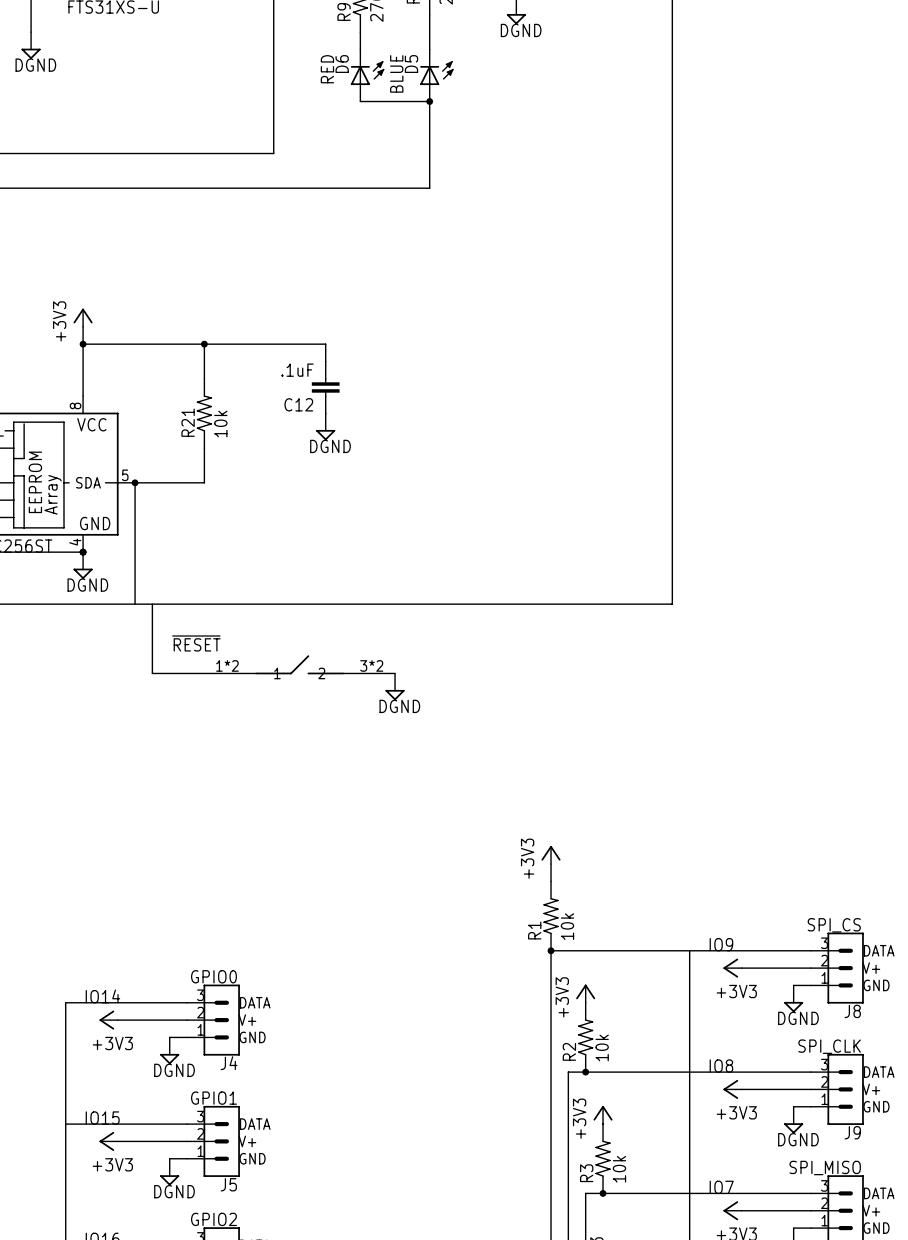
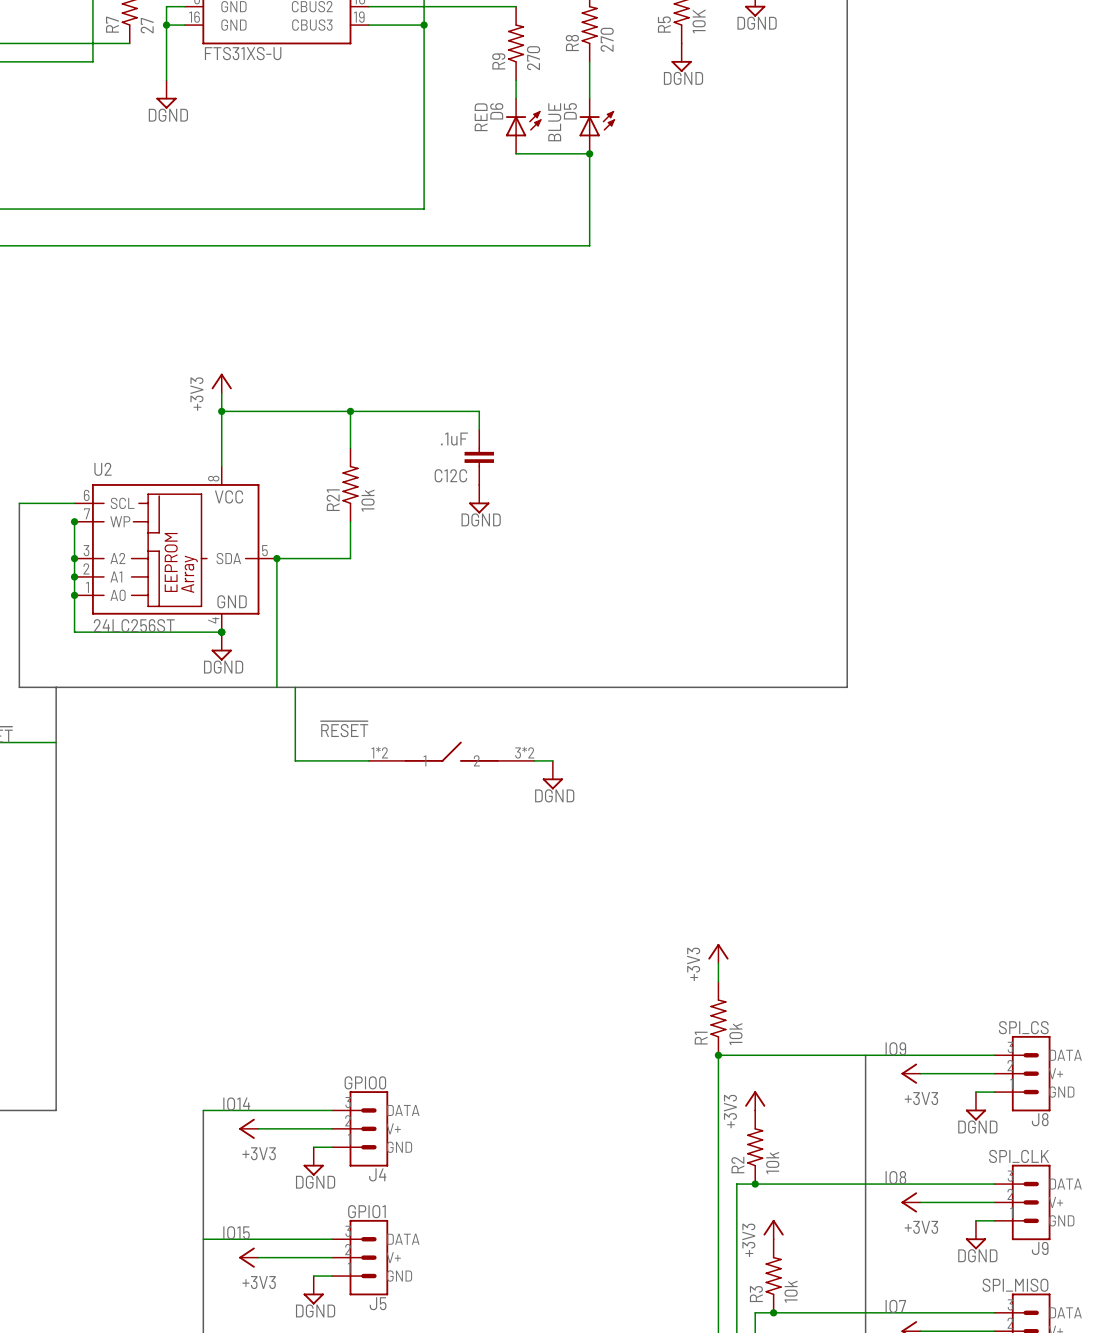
C12 name: C12 (298, 404) -> C12C (450, 475)

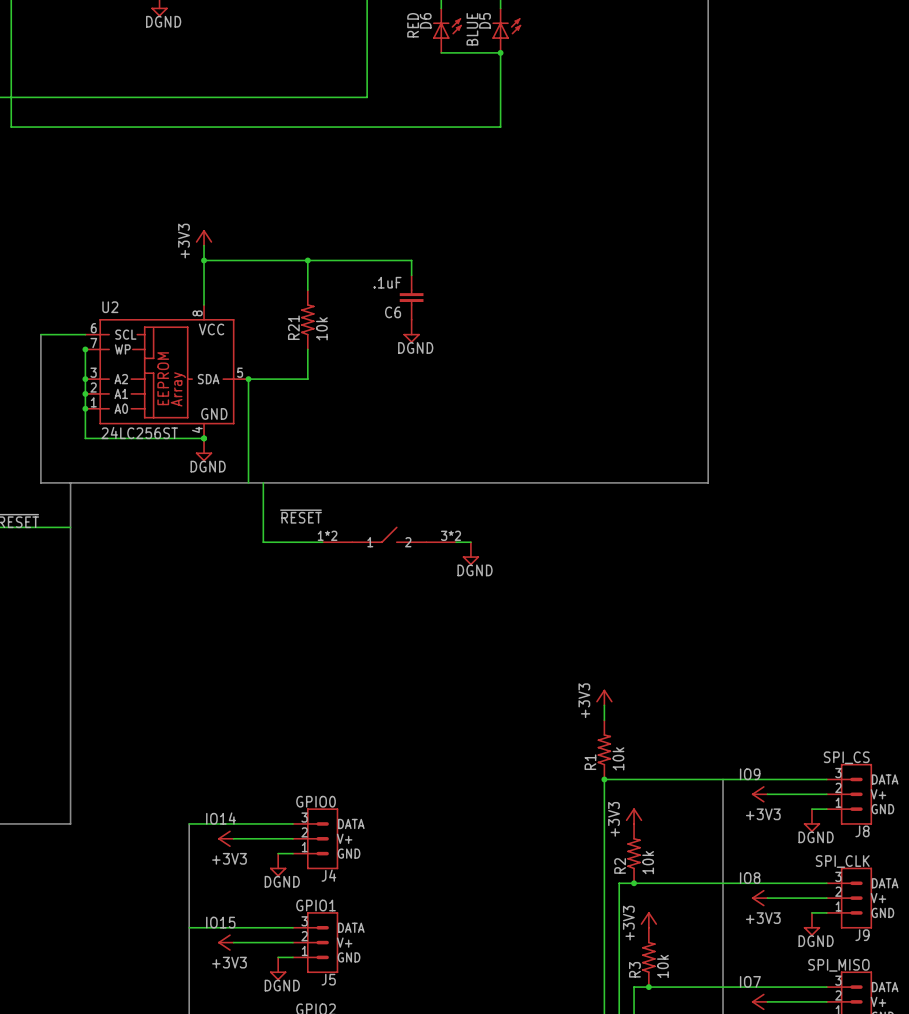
C12C name: C12C (450, 475) -> C6 (393, 312)

